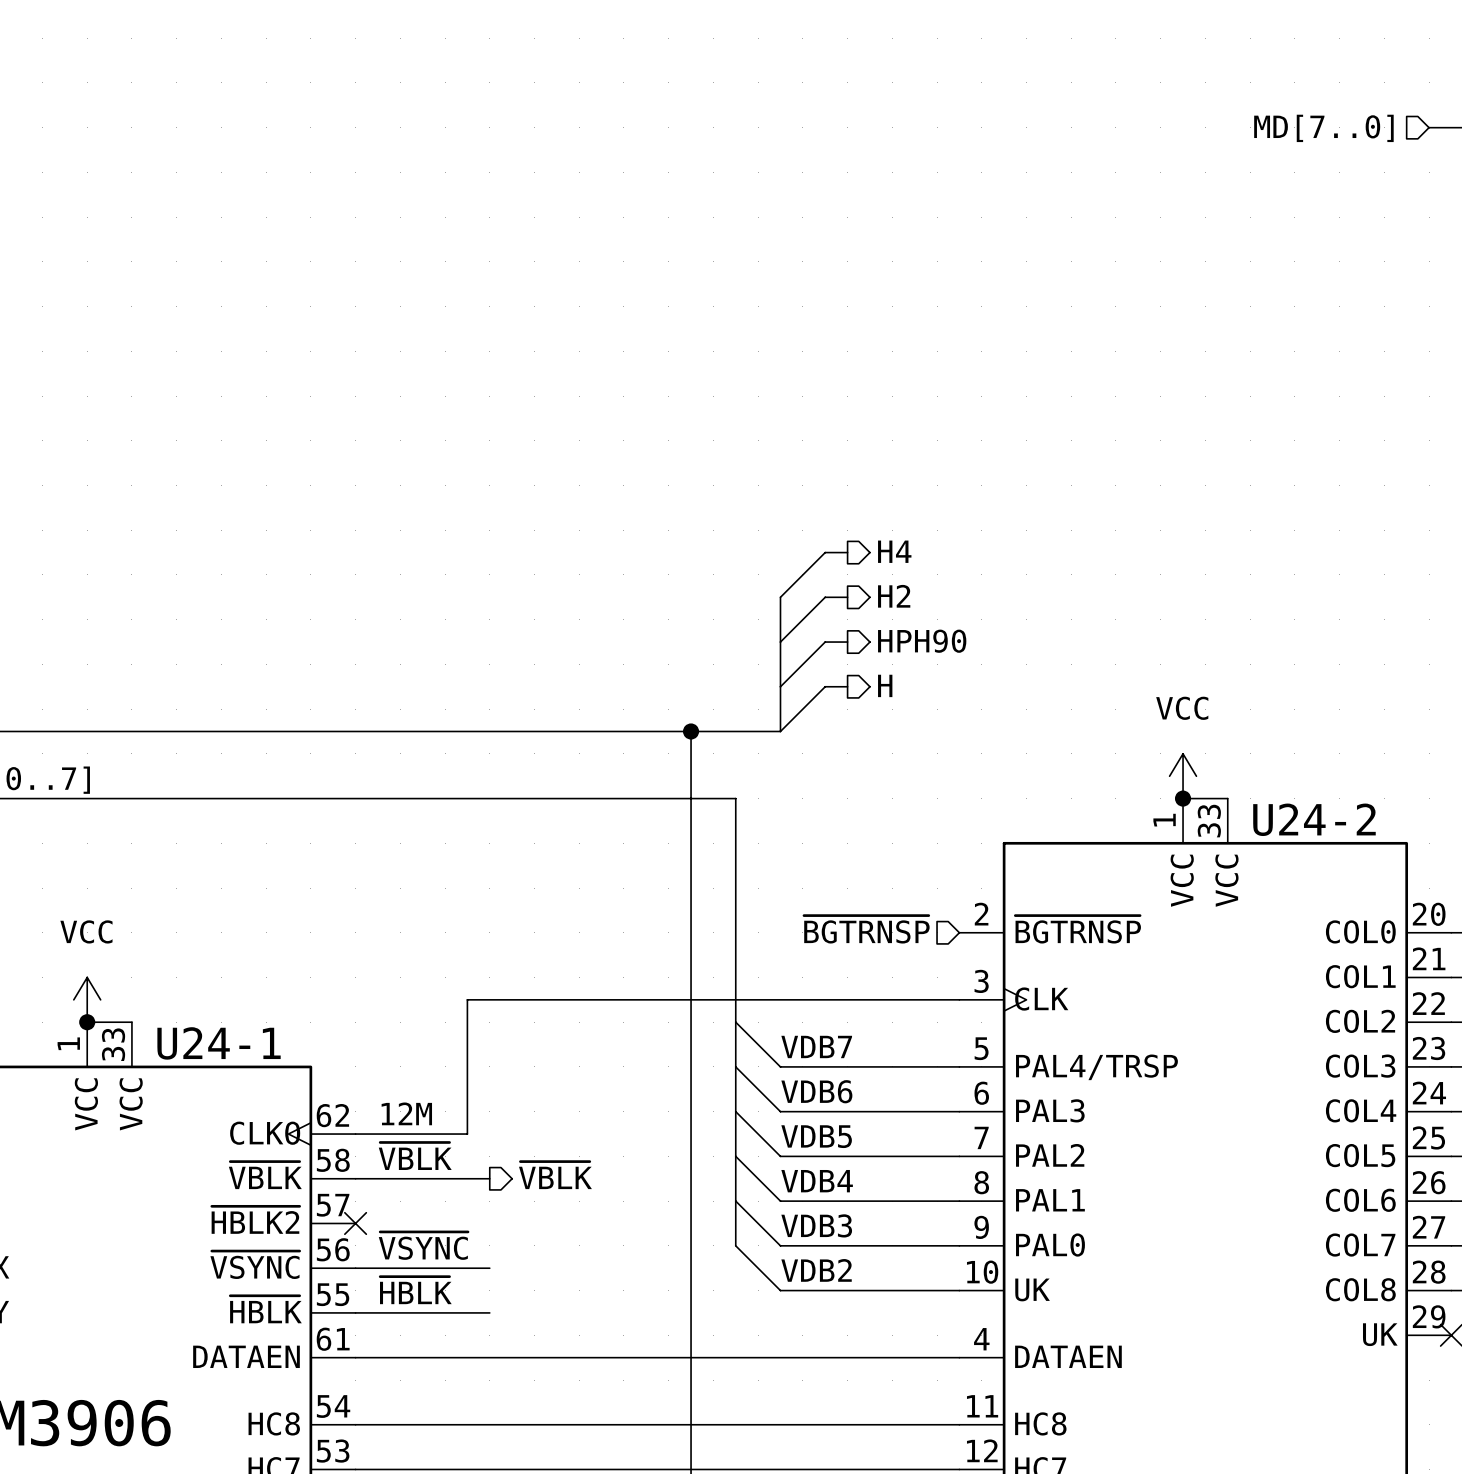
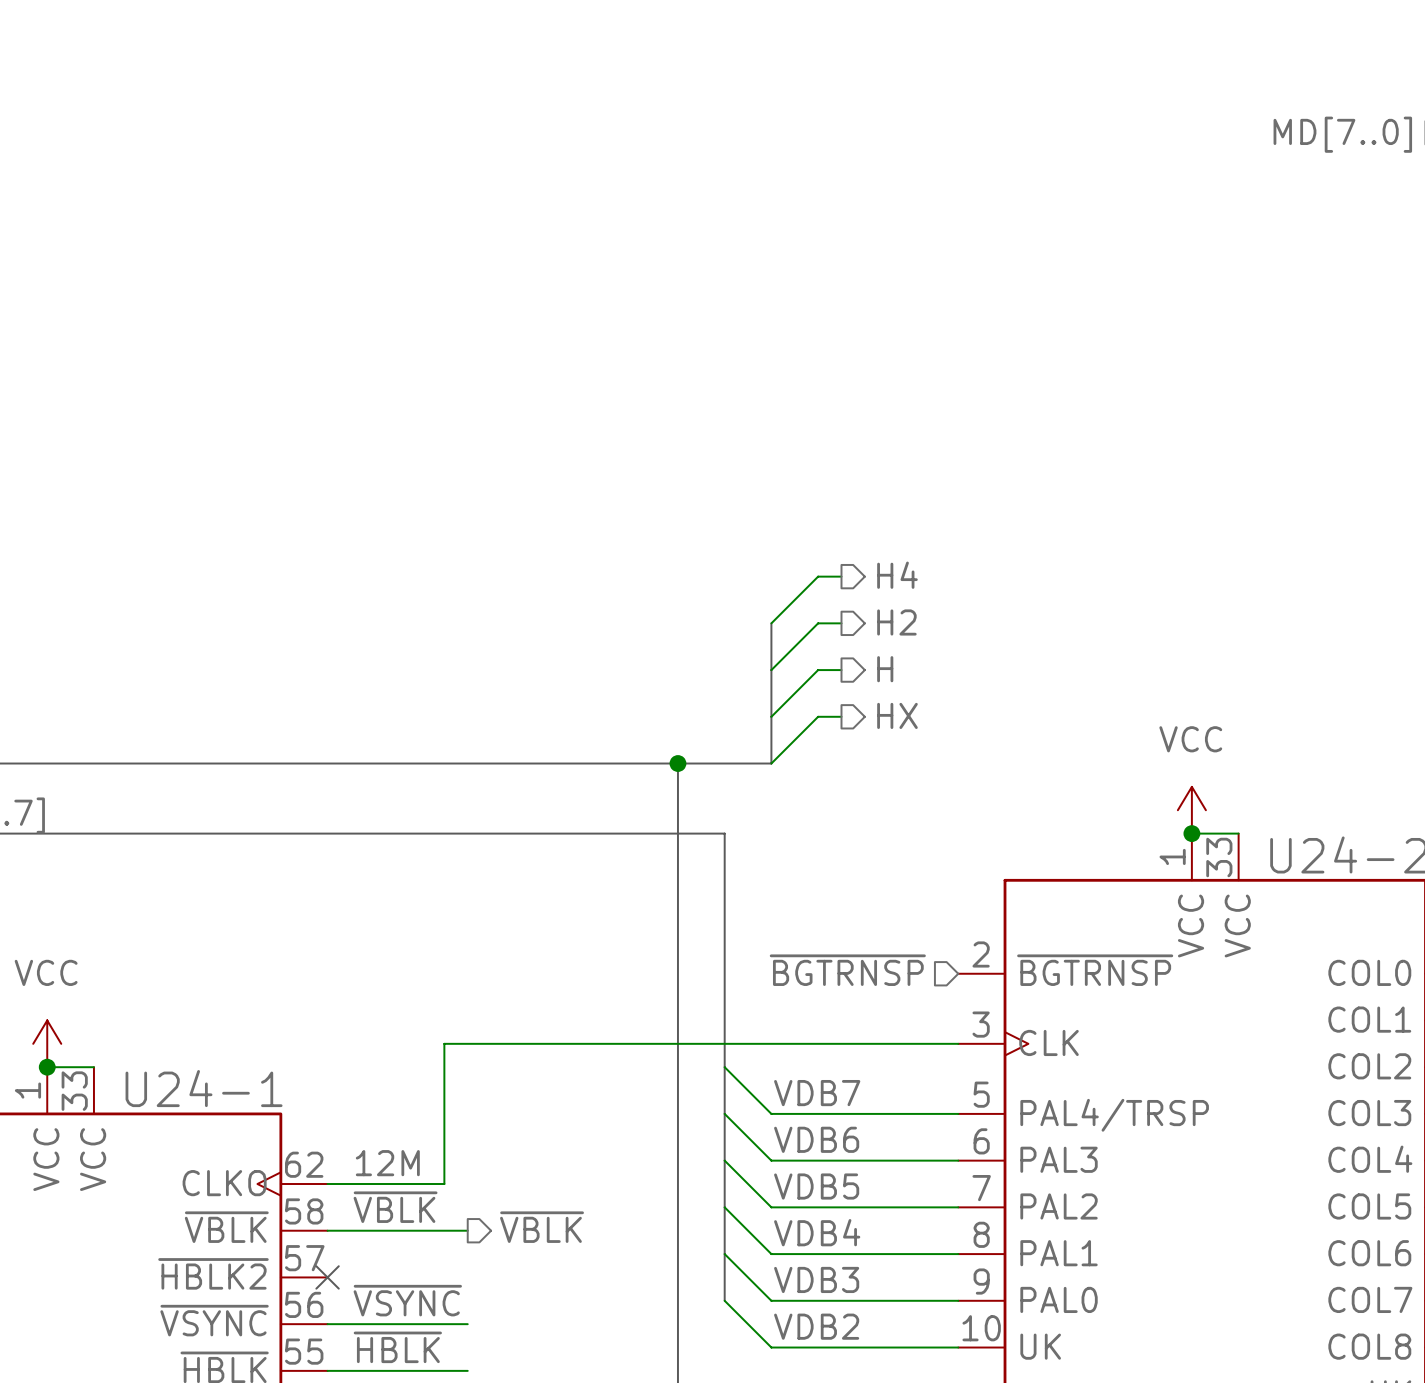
hierarchical label: HPH90 (922, 641) -> H (885, 669)
hierarchical label: H (885, 685) -> HX (897, 715)

